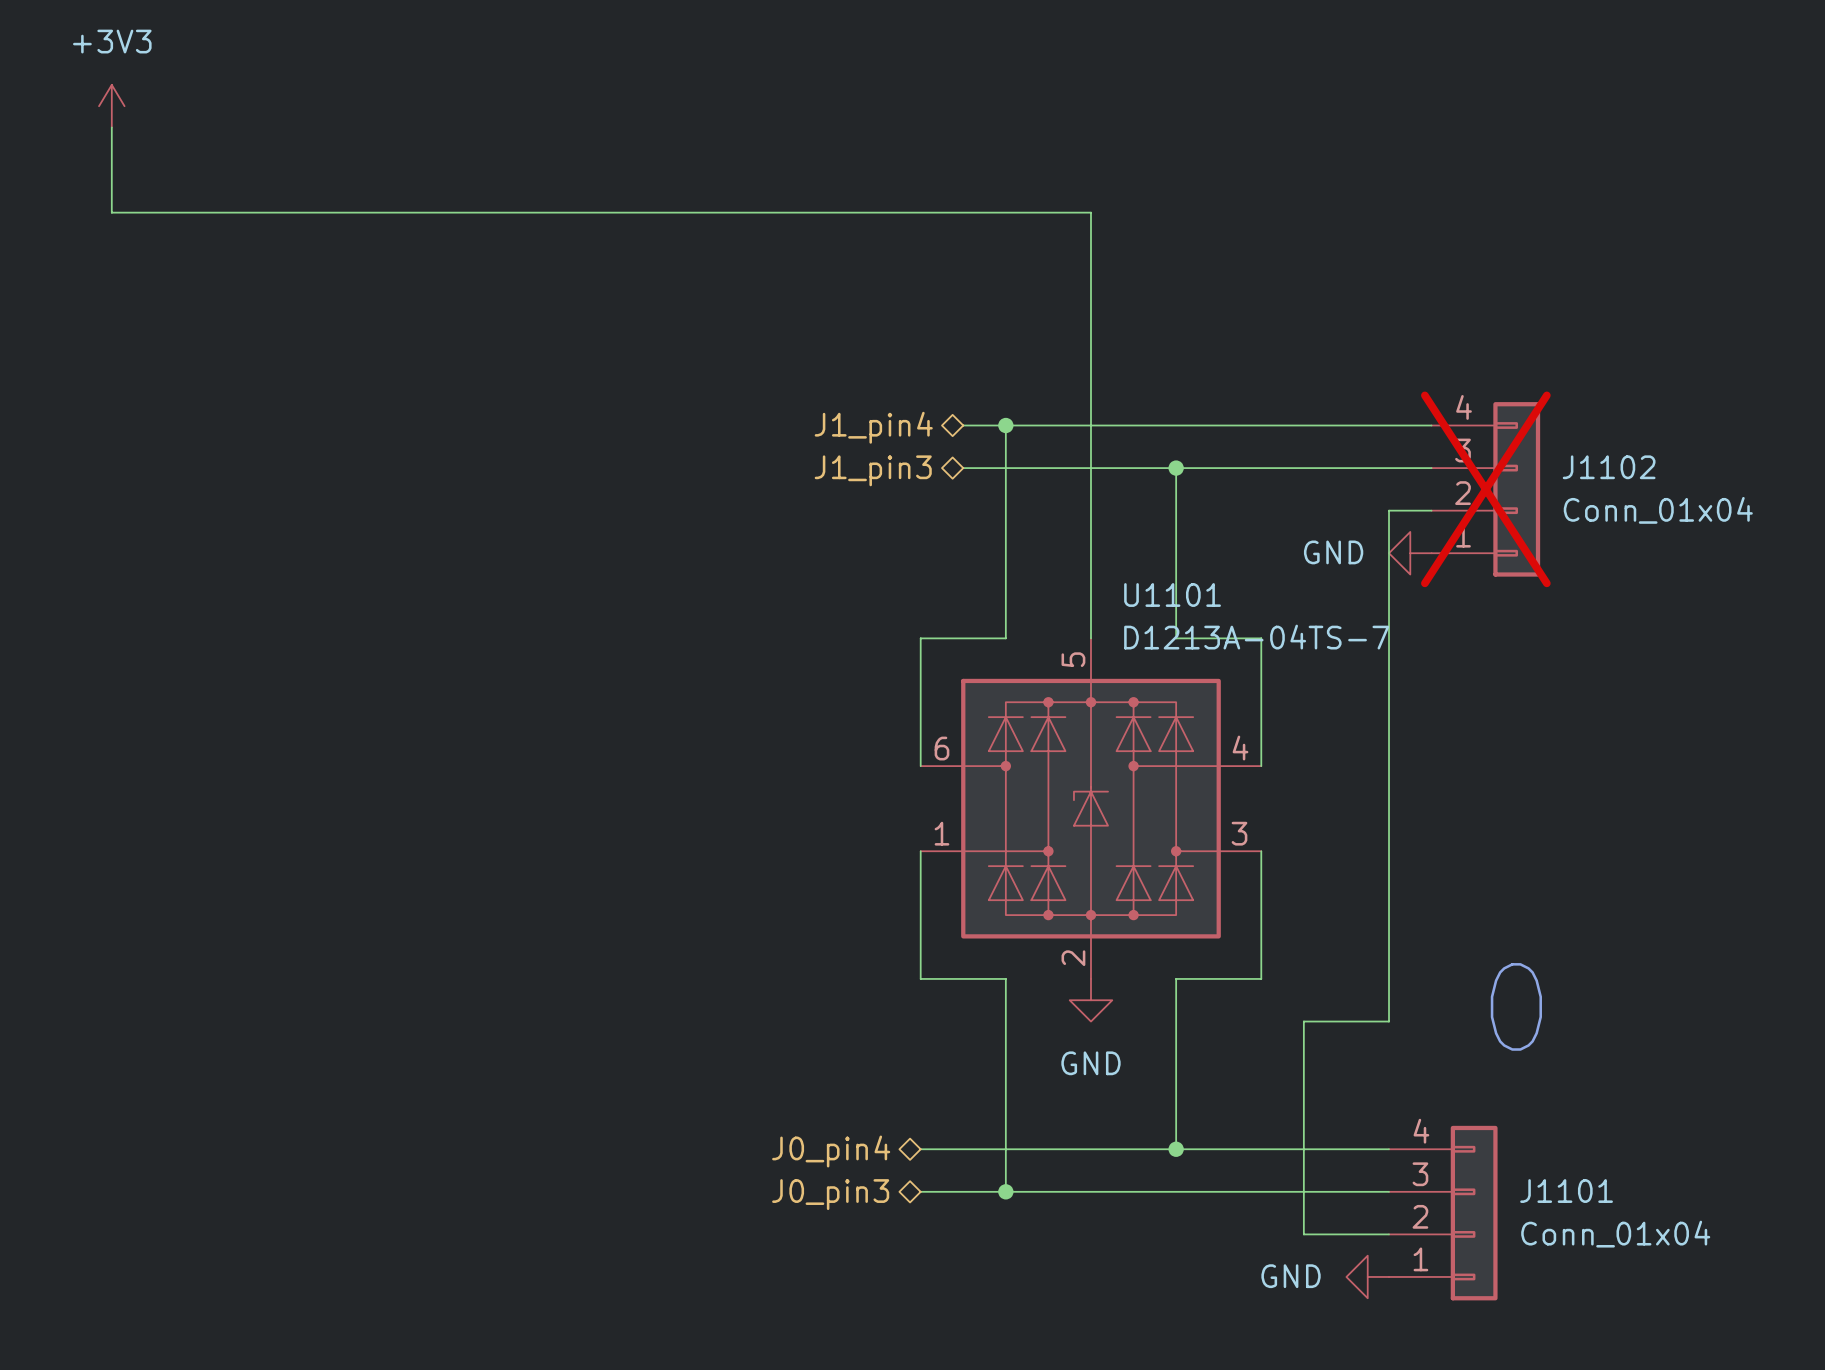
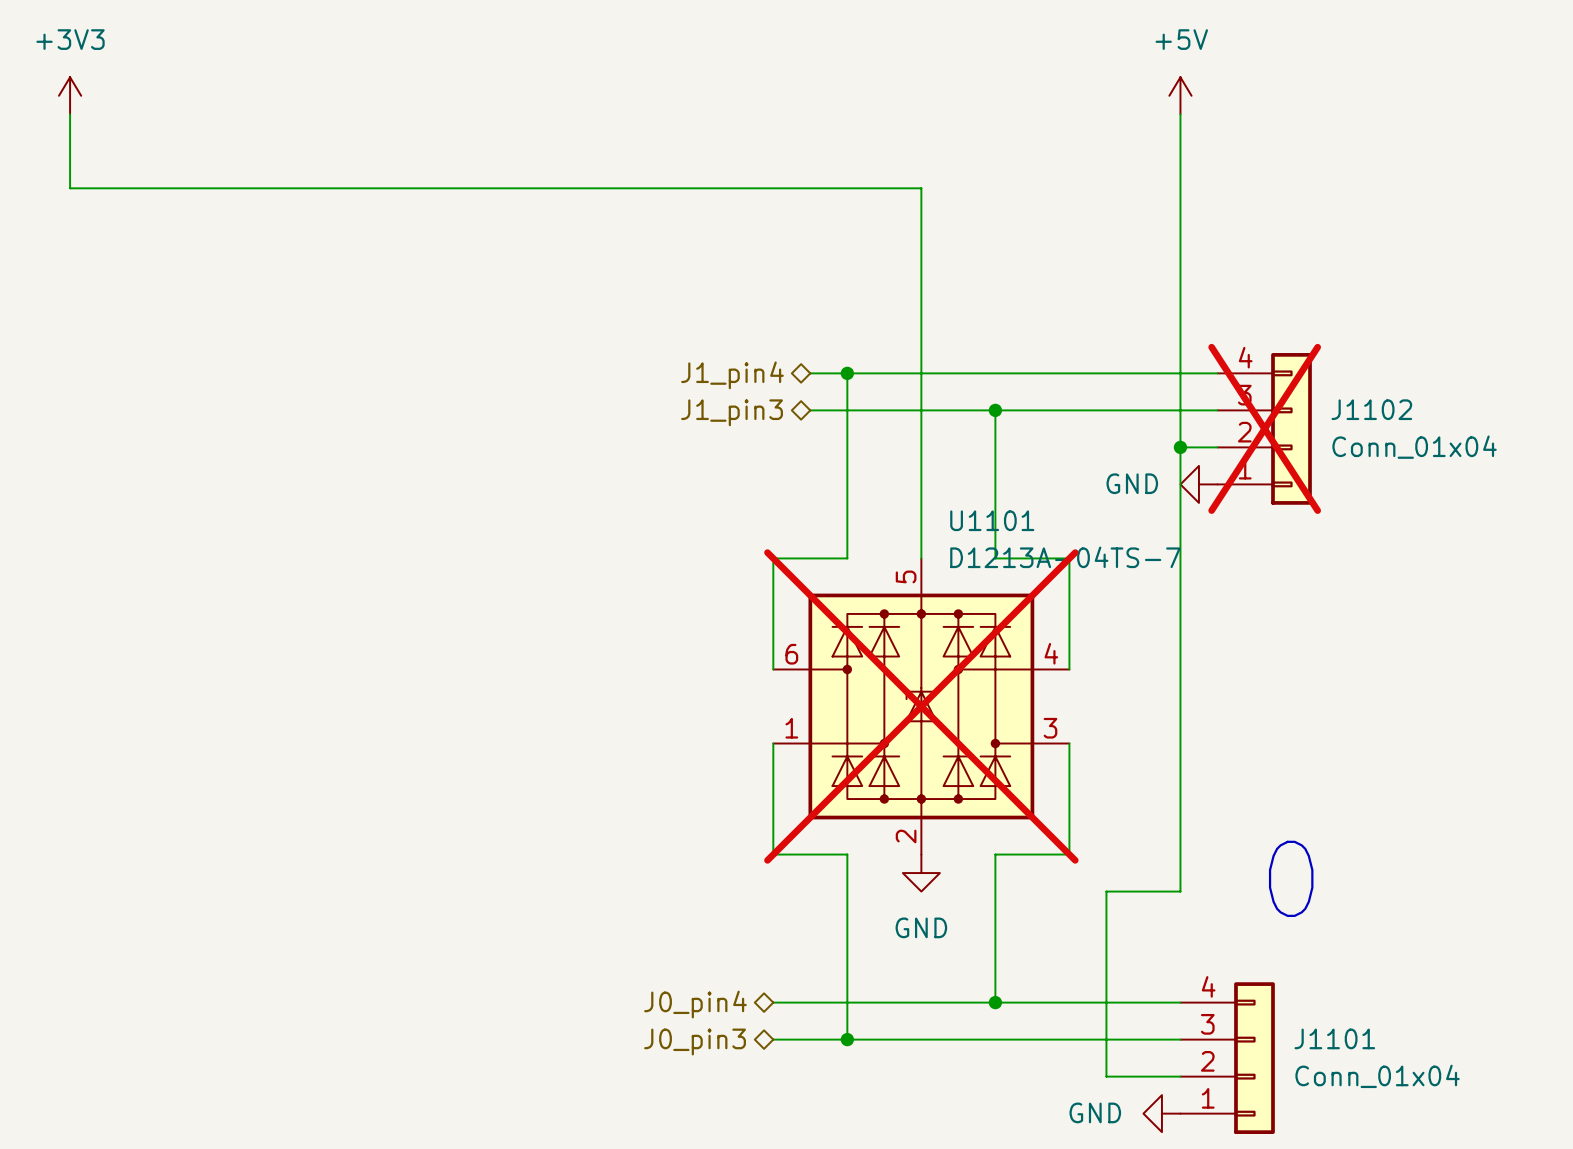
power symbol: none -> +5V (1180, 95)
wire: none -> (1180, 114) (1180, 447)
junction: none -> (1180, 447)
U1101 do-not-place cross: none -> (921, 706)

